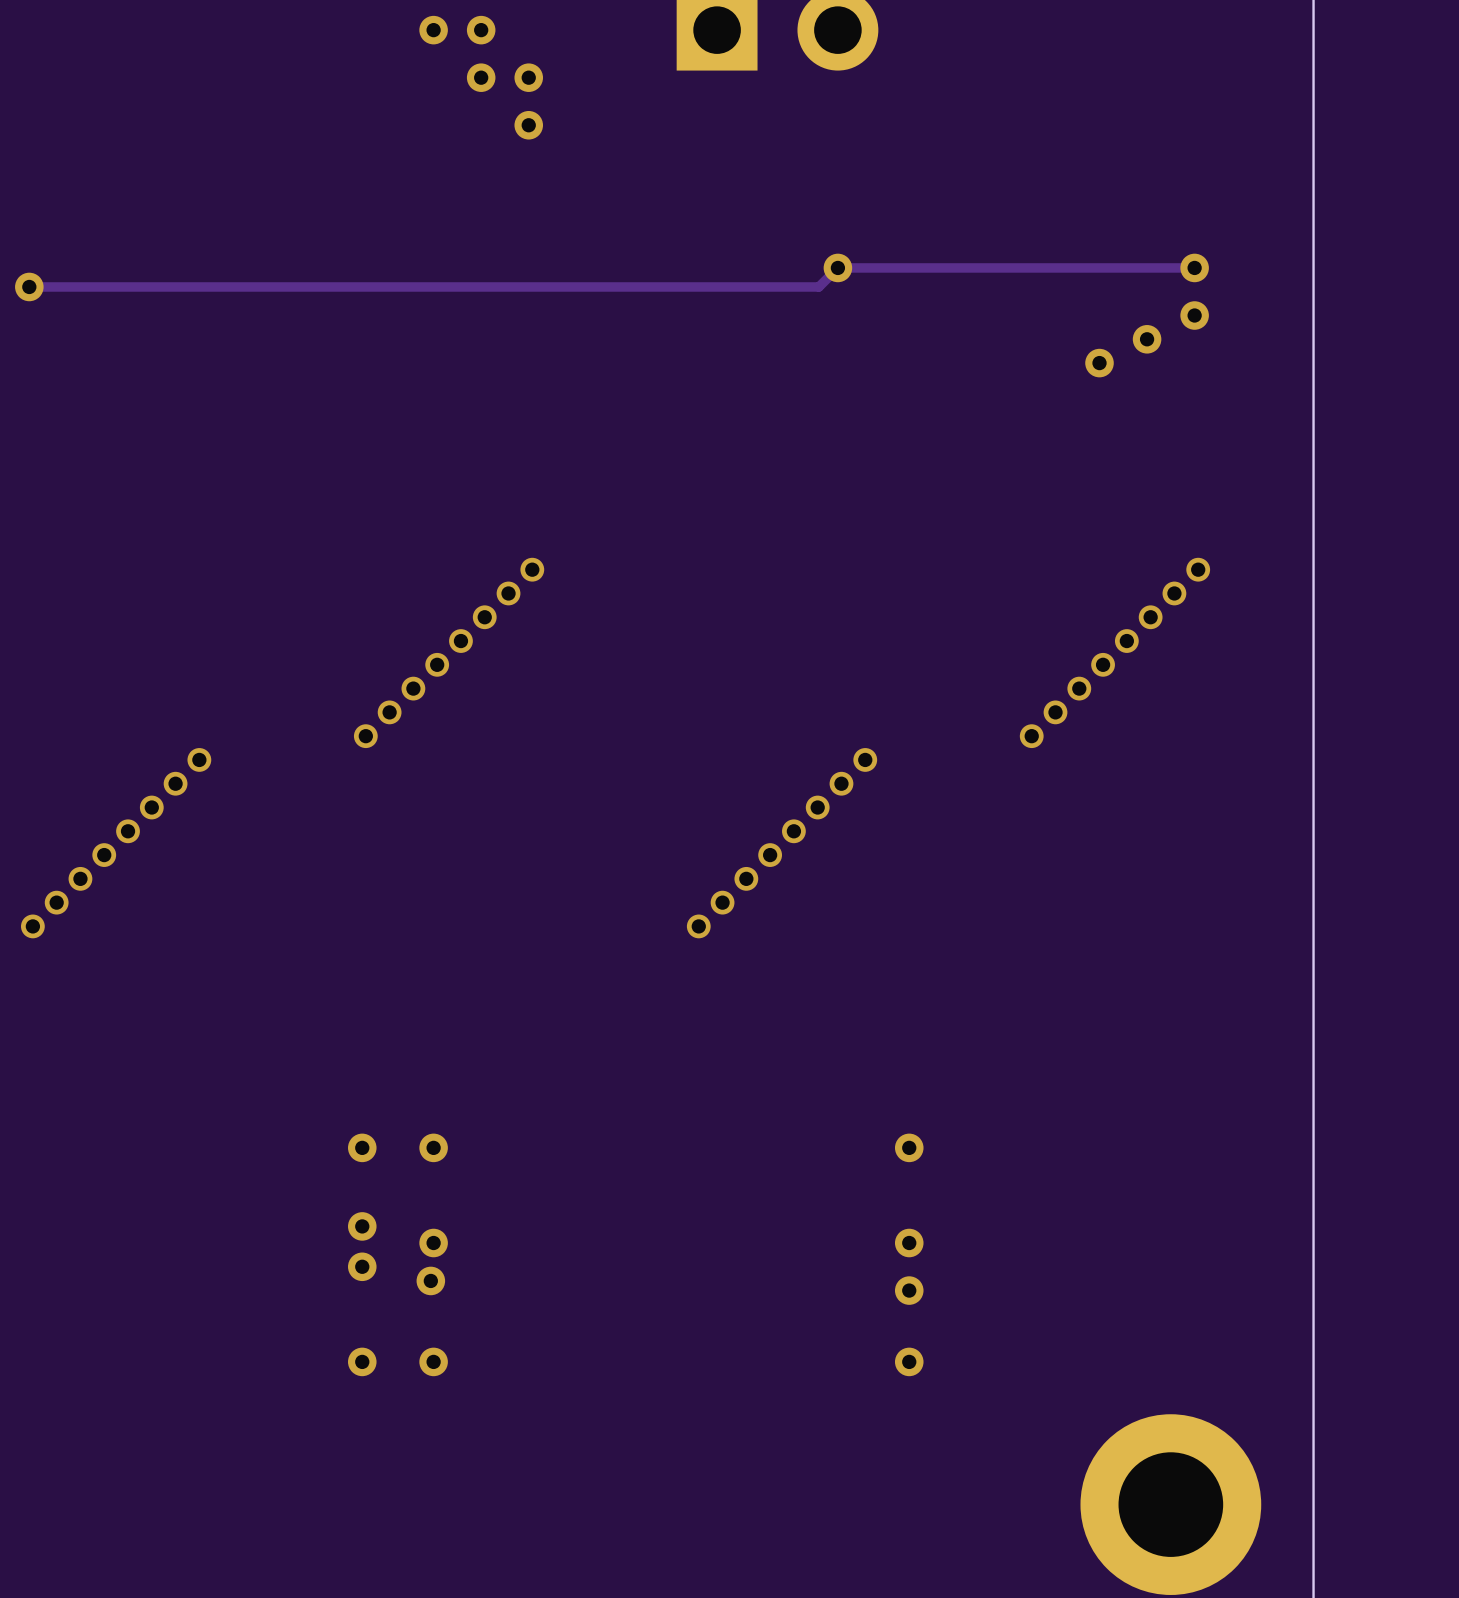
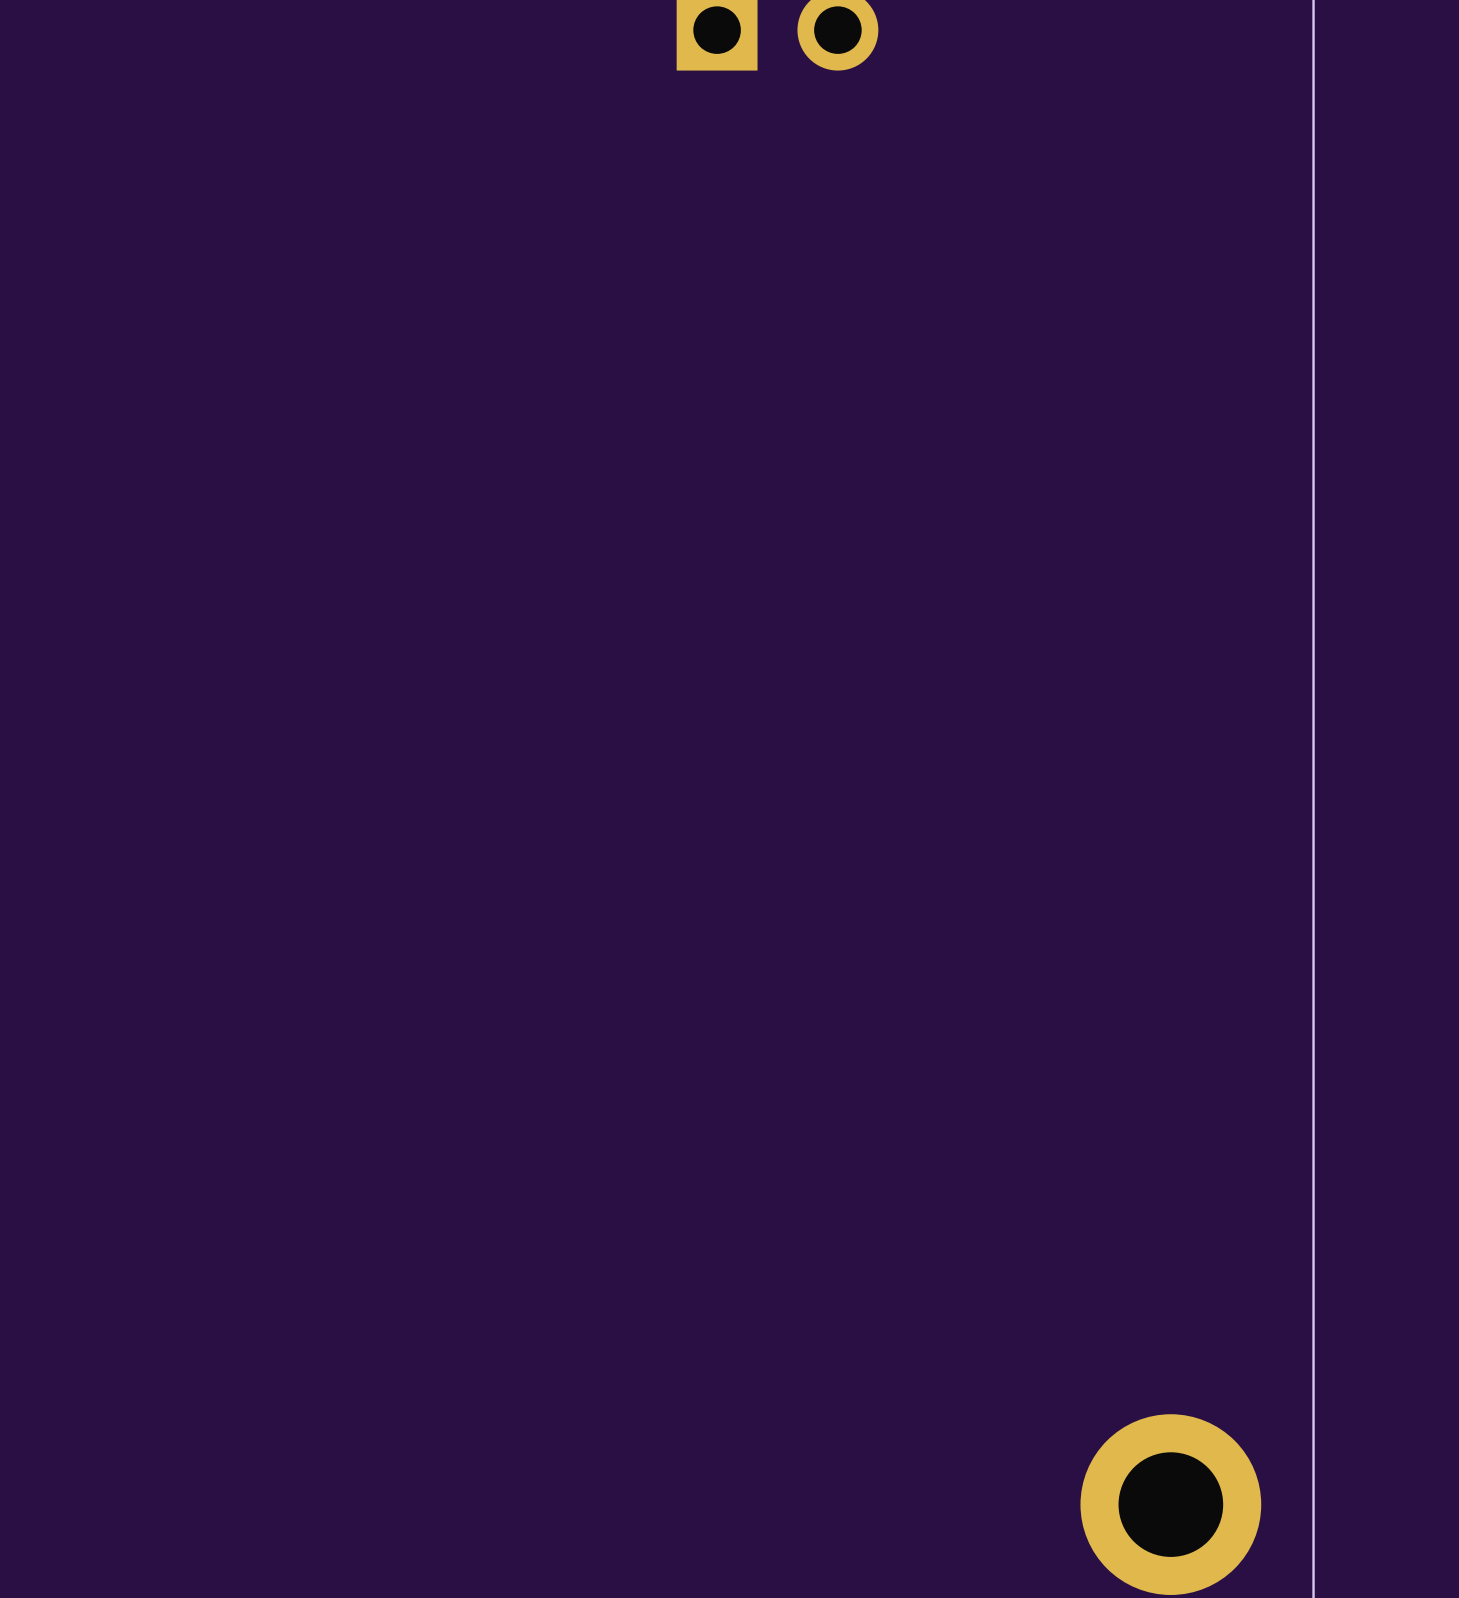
via: (433, 30) -> none
via: (481, 30) -> none
via: (481, 77) -> none
via: (528, 77) -> none
via: (528, 125) -> none
via: (837, 267) -> none
track: (1194, 267) (837, 267) (818, 286) (29, 286) -> none
via: (1194, 267) -> none
via: (29, 286) -> none
via: (1194, 315) -> none
via: (1147, 339) -> none
via: (1099, 363) -> none
via: (532, 569) -> none
via: (1198, 569) -> none
via: (508, 593) -> none
via: (1174, 593) -> none
via: (484, 617) -> none
via: (1150, 617) -> none
via: (460, 641) -> none
via: (1126, 641) -> none
via: (437, 664) -> none
via: (1103, 664) -> none
via: (413, 688) -> none
via: (1079, 688) -> none
via: (389, 712) -> none
via: (1055, 712) -> none
via: (365, 736) -> none
via: (1031, 736) -> none
via: (199, 759) -> none
via: (865, 759) -> none
via: (175, 783) -> none
via: (841, 783) -> none
via: (151, 807) -> none
via: (817, 807) -> none
via: (128, 831) -> none
via: (793, 831) -> none
via: (104, 855) -> none
via: (770, 855) -> none
via: (80, 878) -> none
via: (746, 878) -> none
via: (56, 902) -> none
via: (722, 902) -> none
via: (32, 926) -> none
via: (698, 926) -> none
via: (362, 1147) -> none
via: (433, 1147) -> none
via: (909, 1147) -> none
via: (362, 1226) -> none
via: (433, 1243) -> none
via: (909, 1243) -> none
via: (362, 1266) -> none
via: (430, 1280) -> none
via: (909, 1290) -> none
via: (362, 1361) -> none
via: (433, 1361) -> none
via: (909, 1361) -> none

